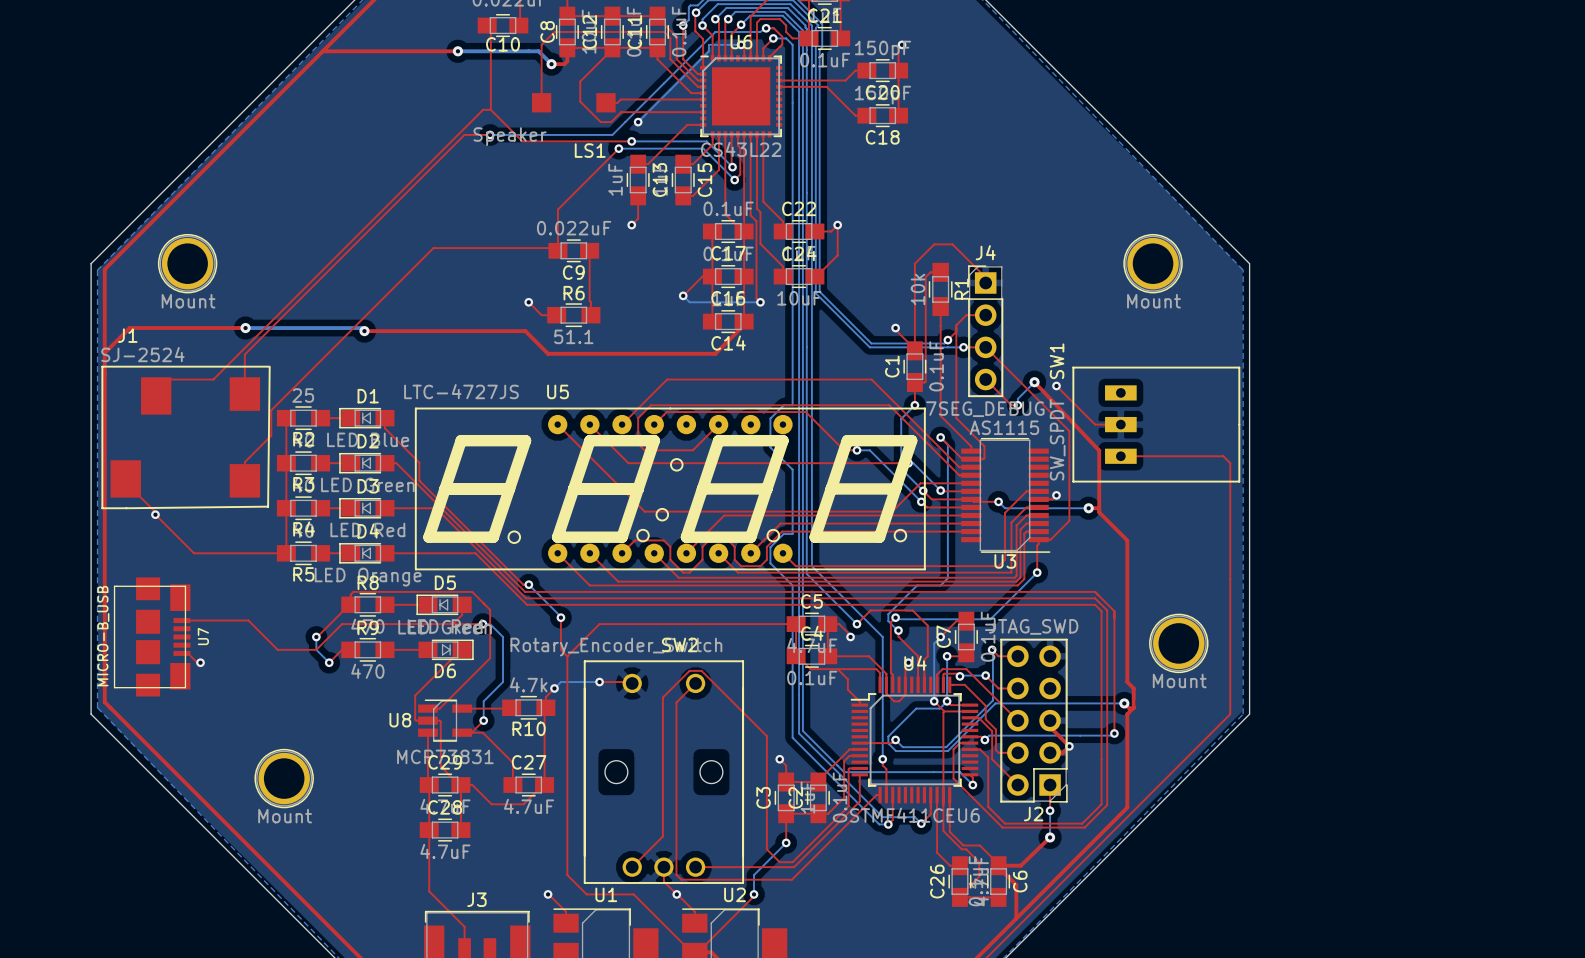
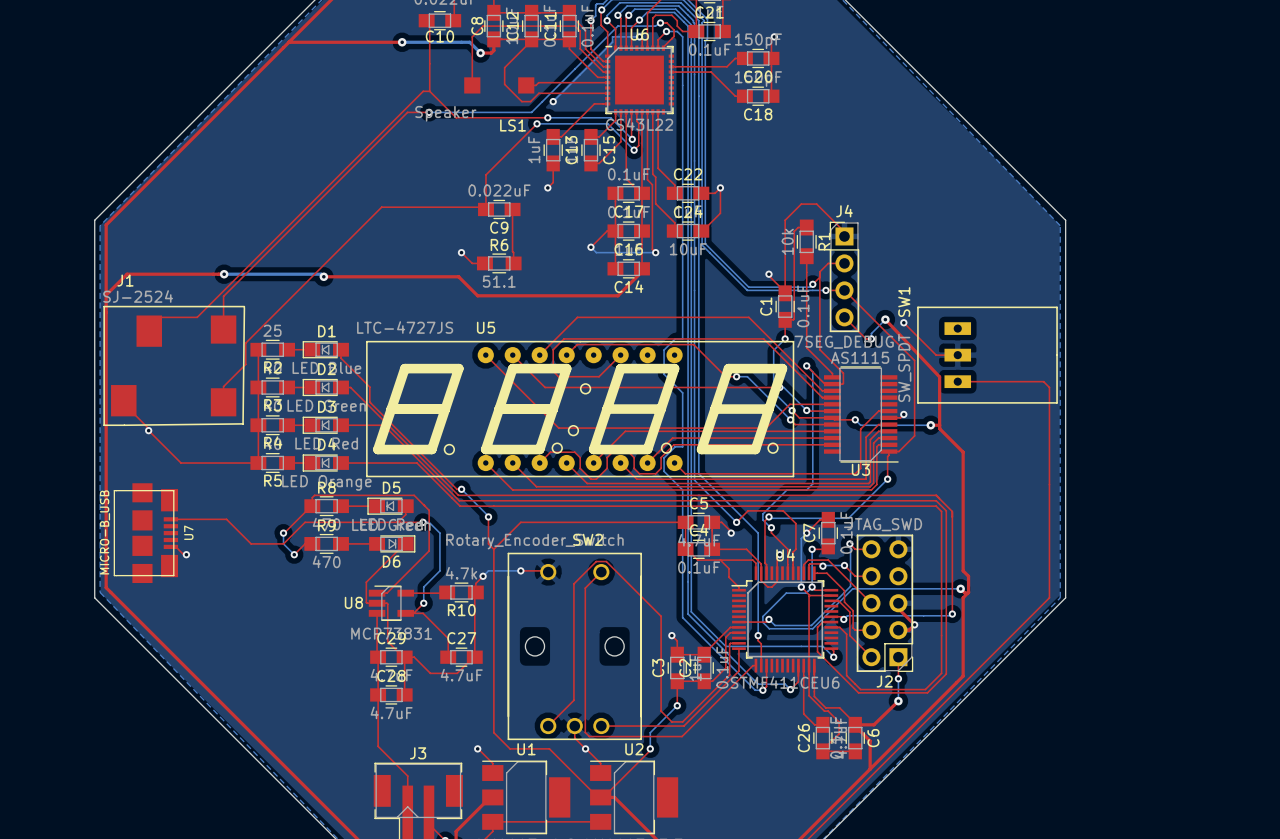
part: Mount (187, 263) -> none
part: Mount (1153, 263) -> none
part: Mount (1178, 643) -> none
part: Mount (284, 778) -> none

